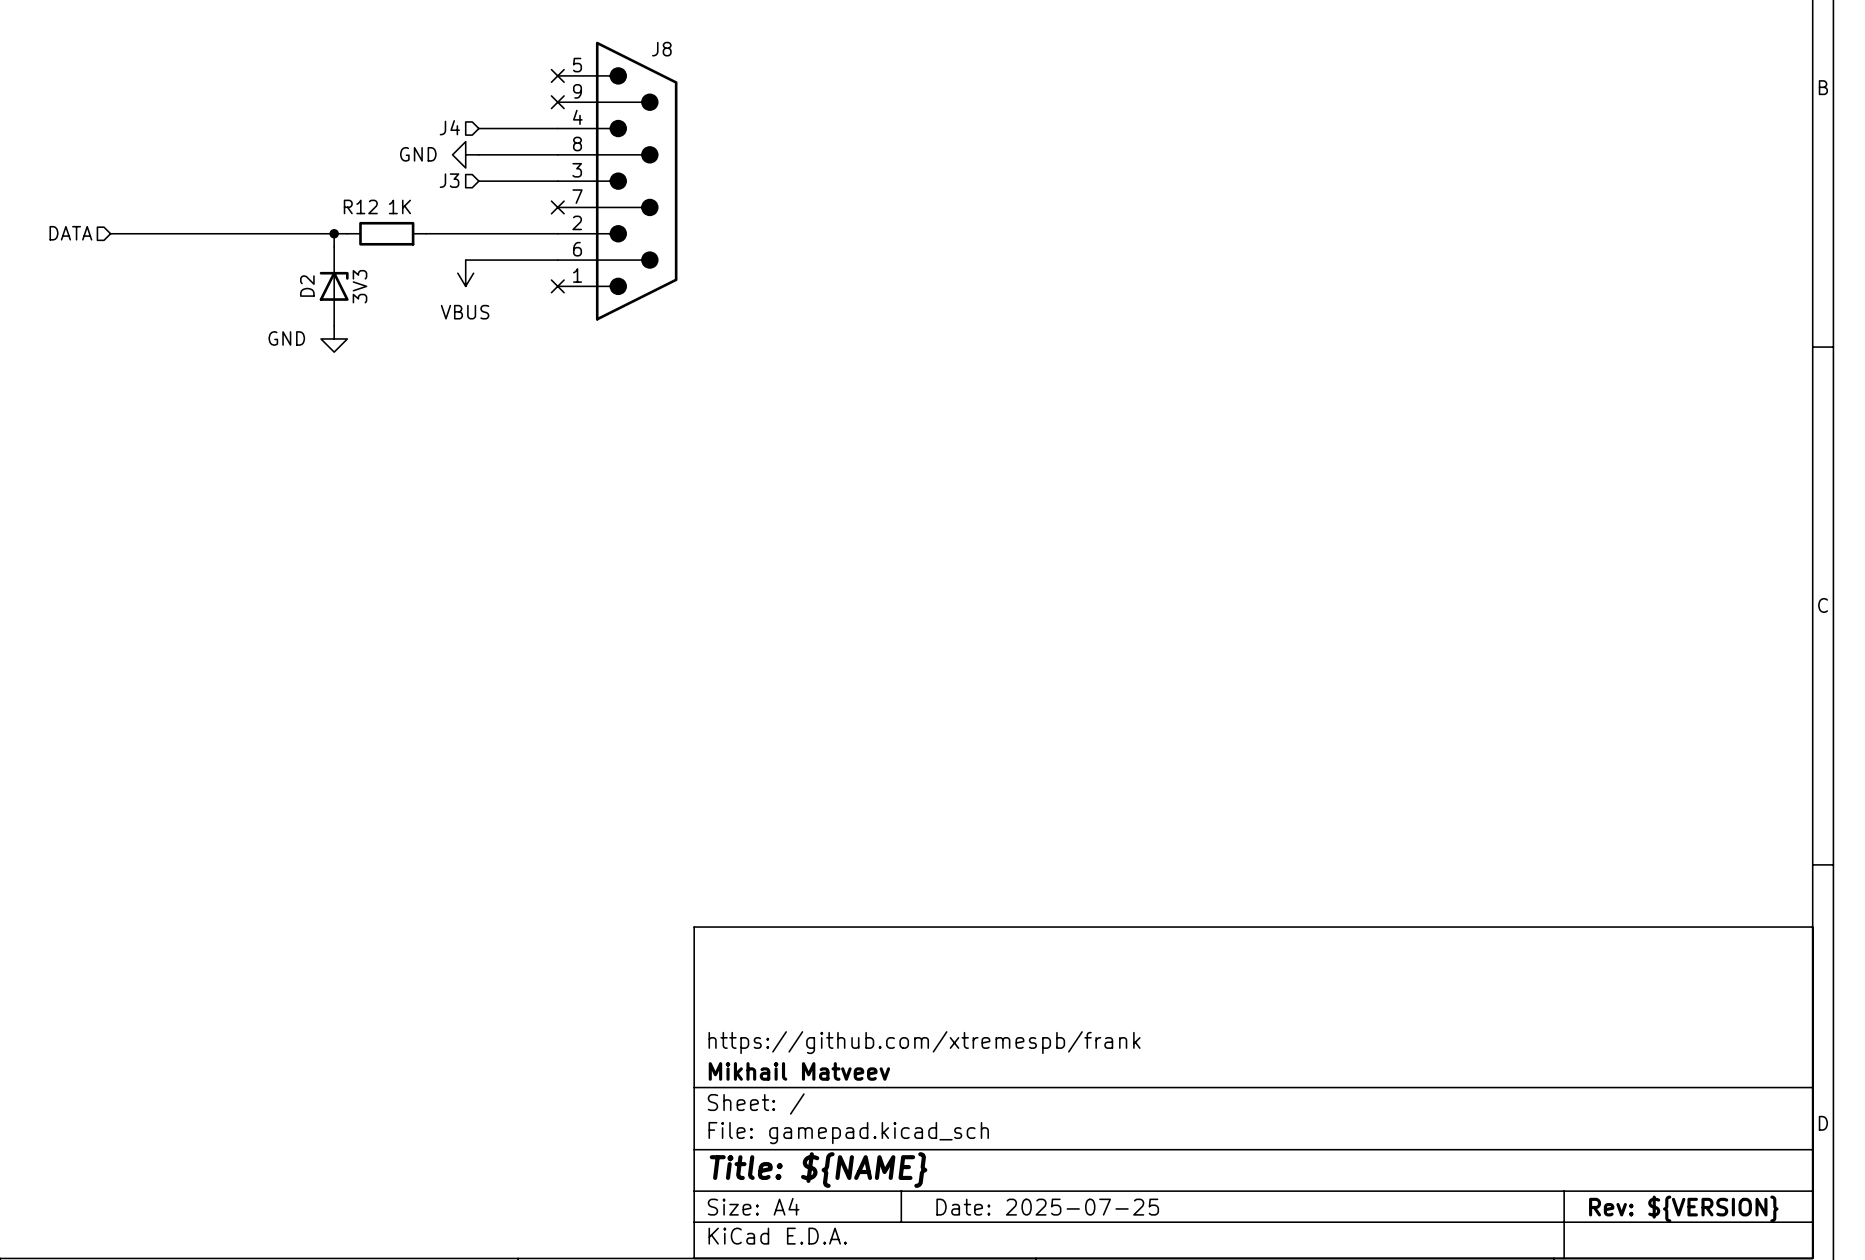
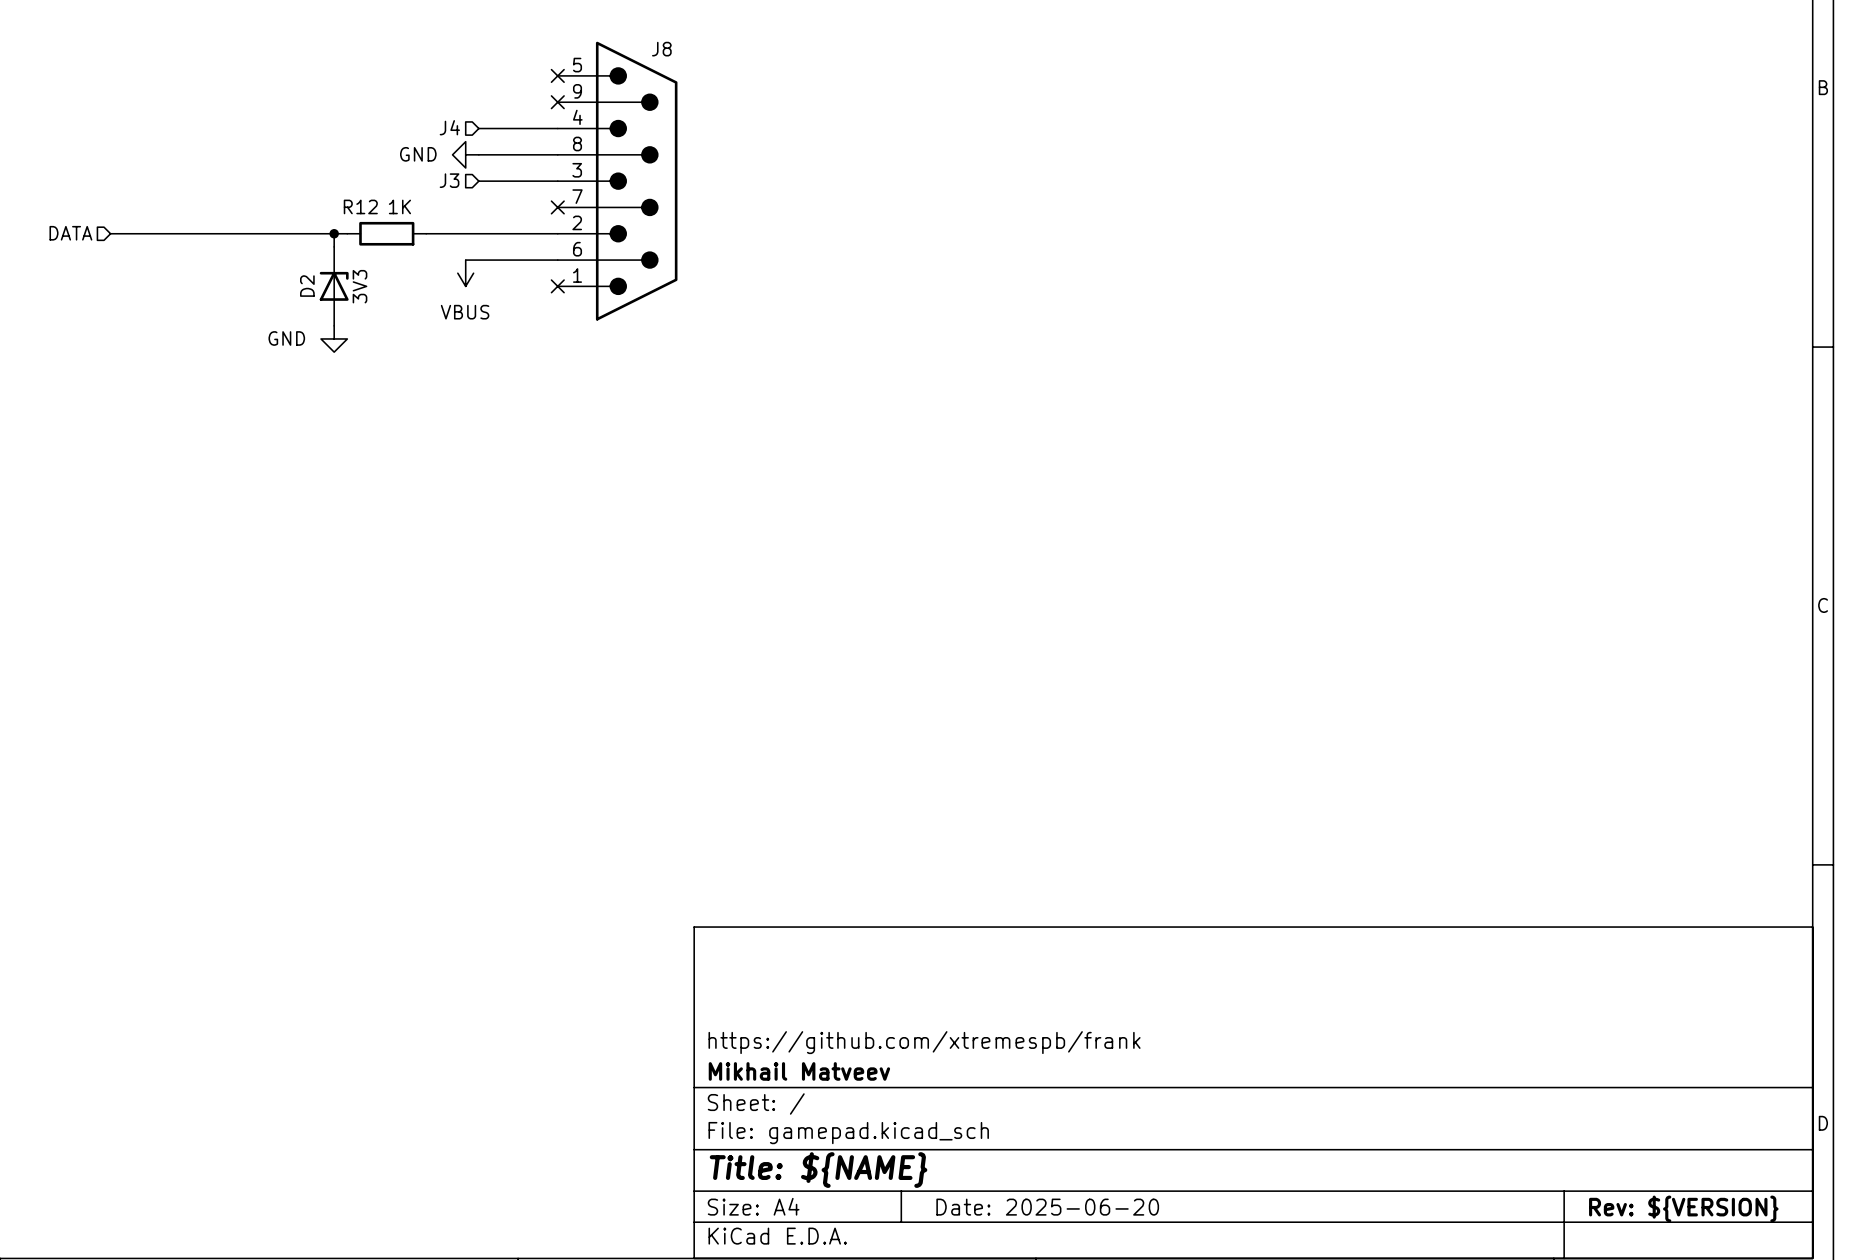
title block: Date: 2025-07-25 (1047, 1207) -> Date: 2025-06-20 (1047, 1207)

